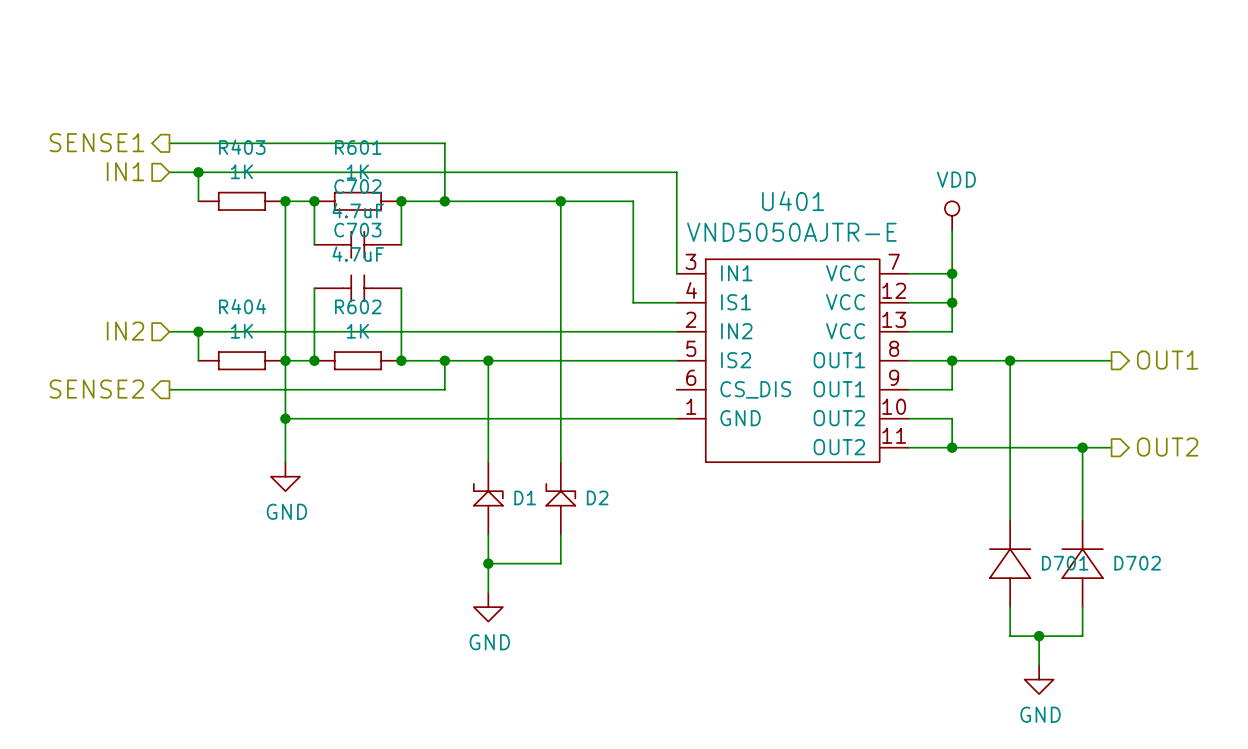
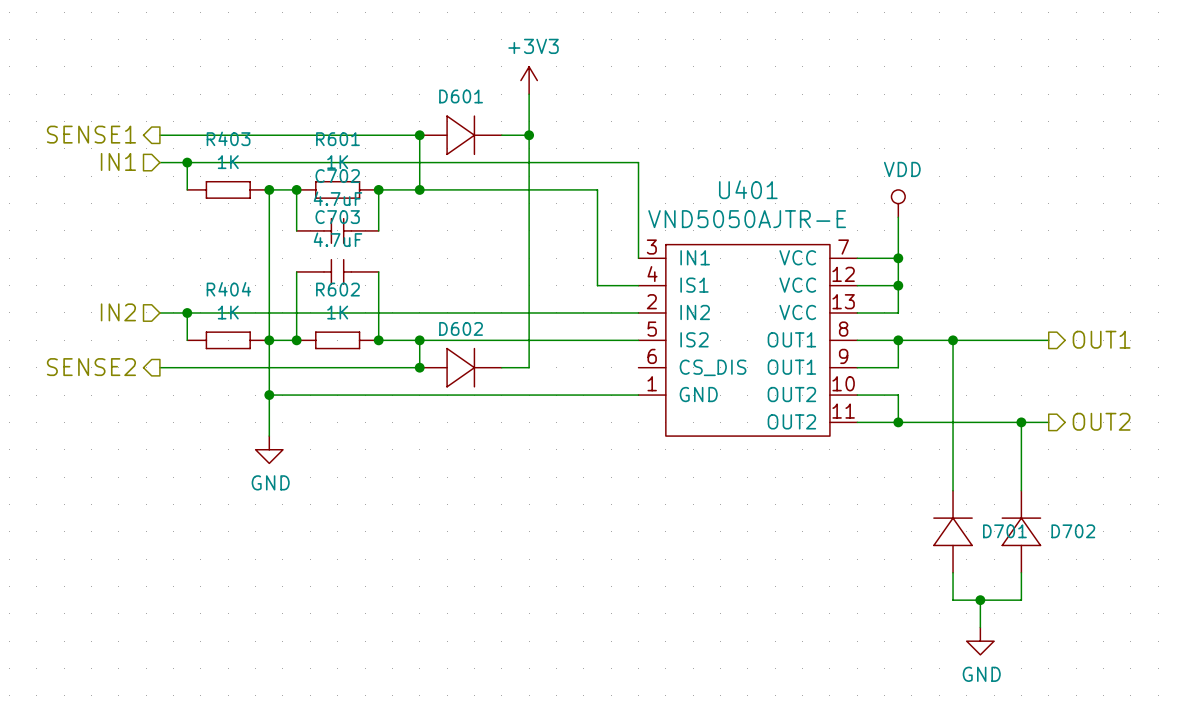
power symbol: none -> +3V3 (529, 80)
junction: none -> (419, 135)
D601: none -> (460, 135)
wire: none -> (501, 135) (529, 135)
junction position: (560, 201) -> (529, 135)
wire: (488, 360) (488, 462) -> (529, 94) (529, 189)
junction position: (488, 360) -> (419, 367)
D602: none -> (460, 367)
wire: (560, 389) (560, 462) -> (529, 367) (501, 367)
D1: (488, 498) -> none
D2: (560, 498) -> none
wire: (488, 534) (488, 592) -> none
wire: (560, 534) (560, 563) (488, 563) -> none
junction: (488, 563) -> none
power symbol: GND (488, 607) -> none

